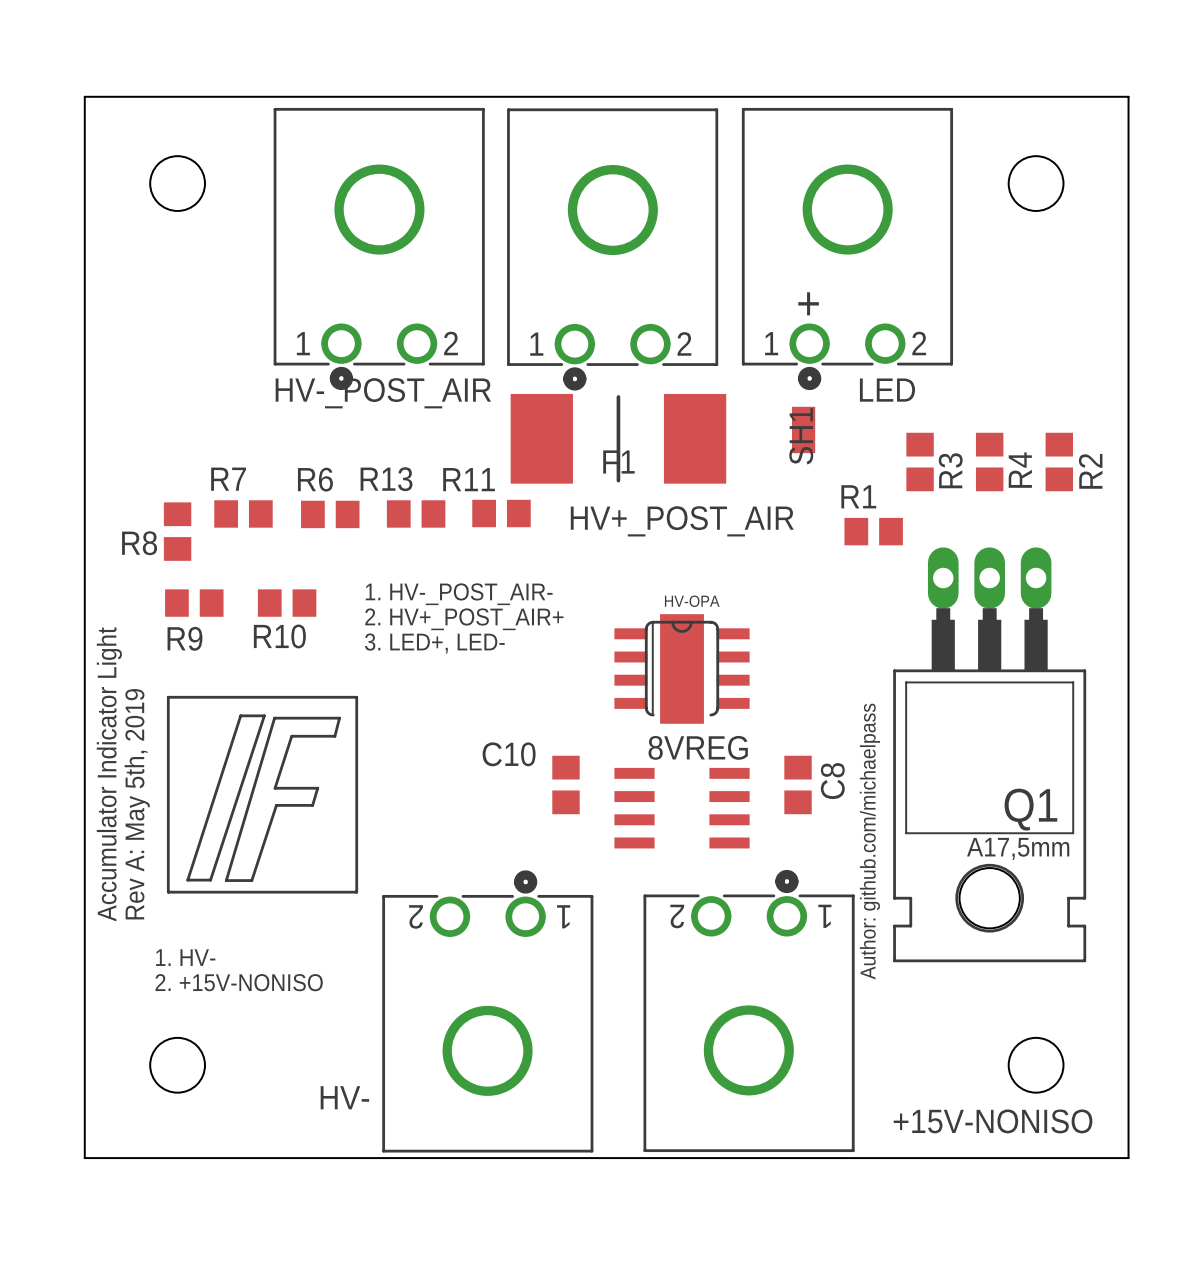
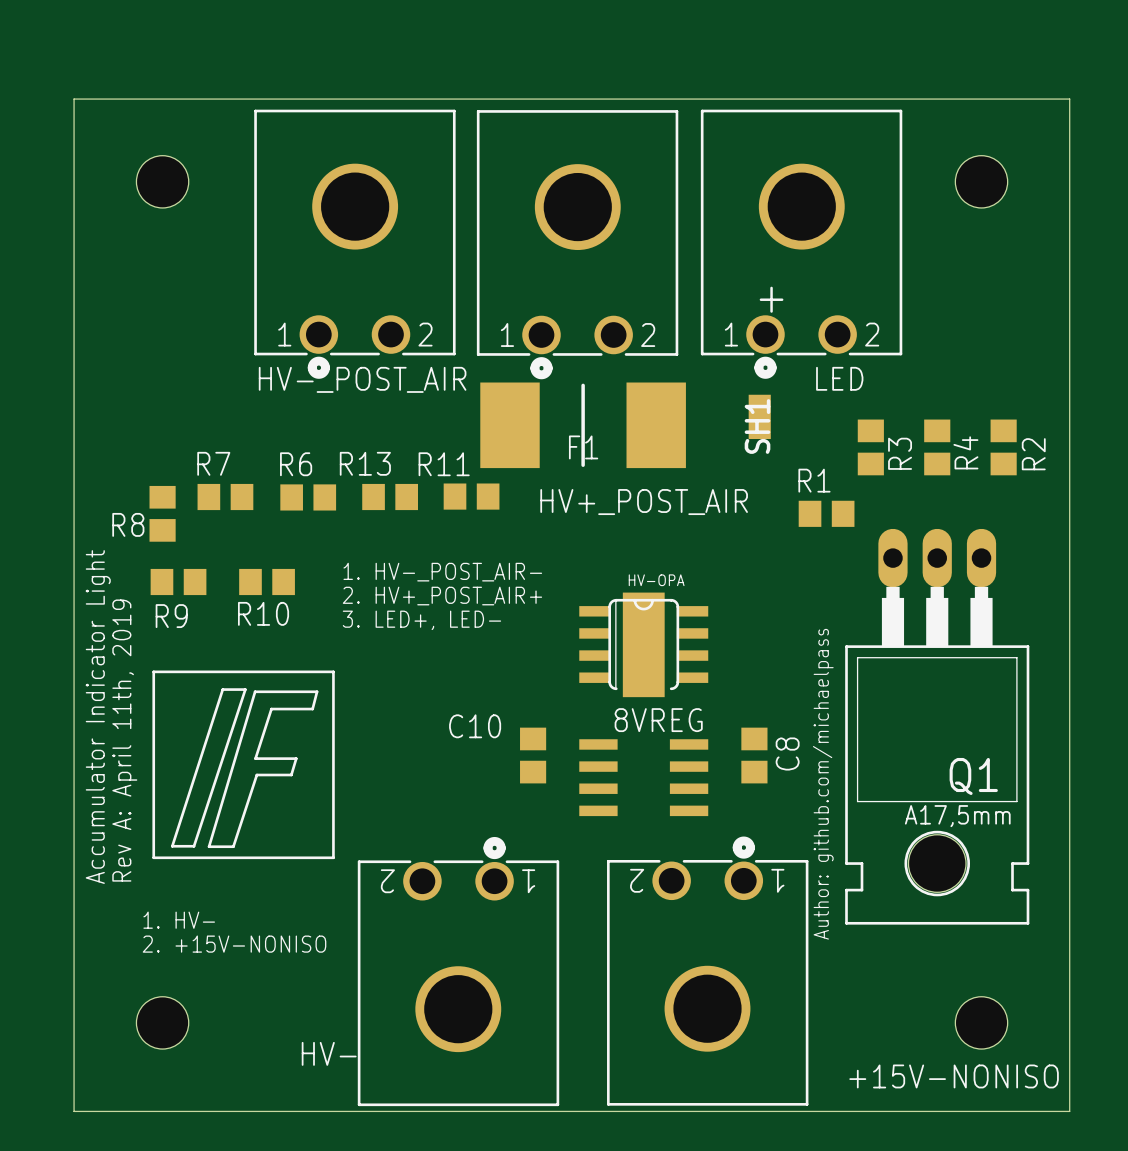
text: Rev A: May 5th, 2019 (137, 804) -> Rev A: April 11th, 2019 (124, 740)

